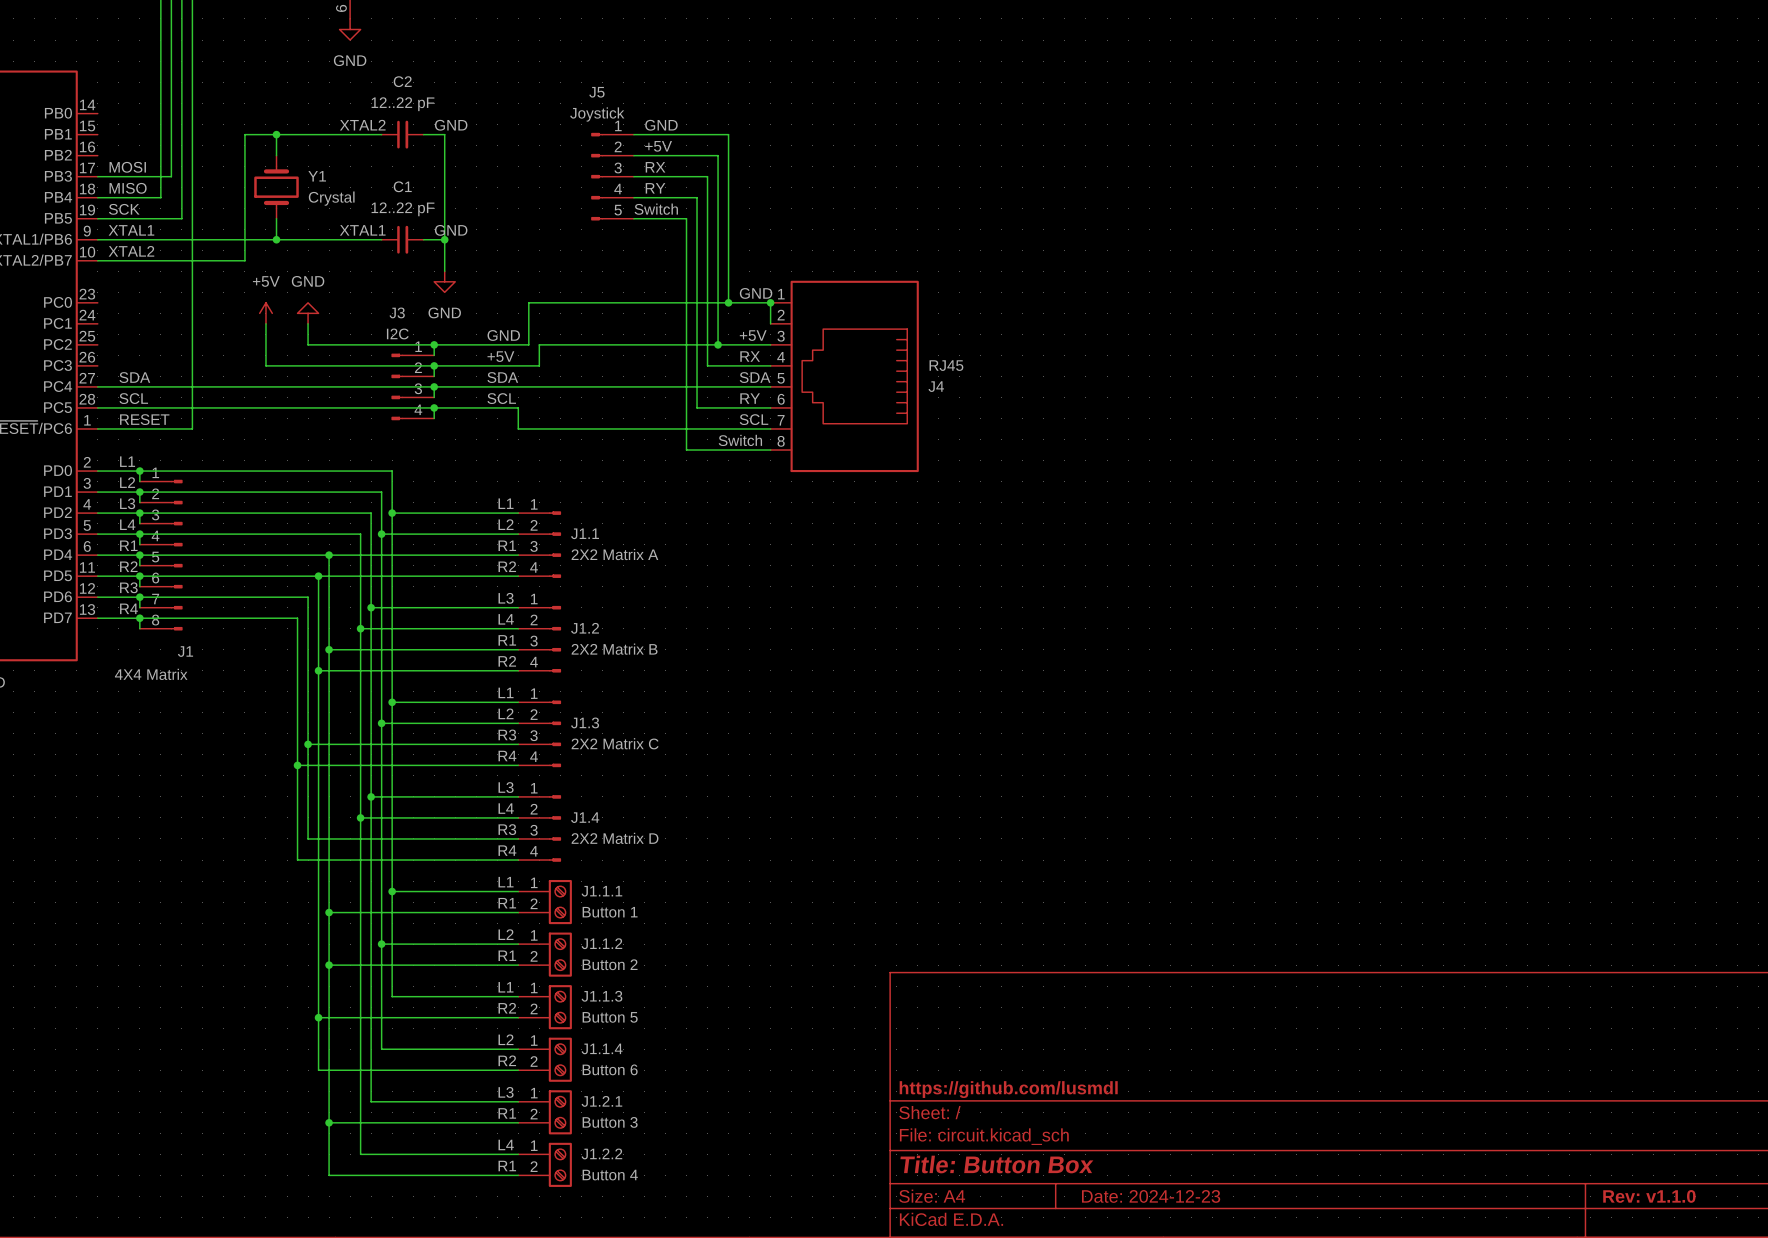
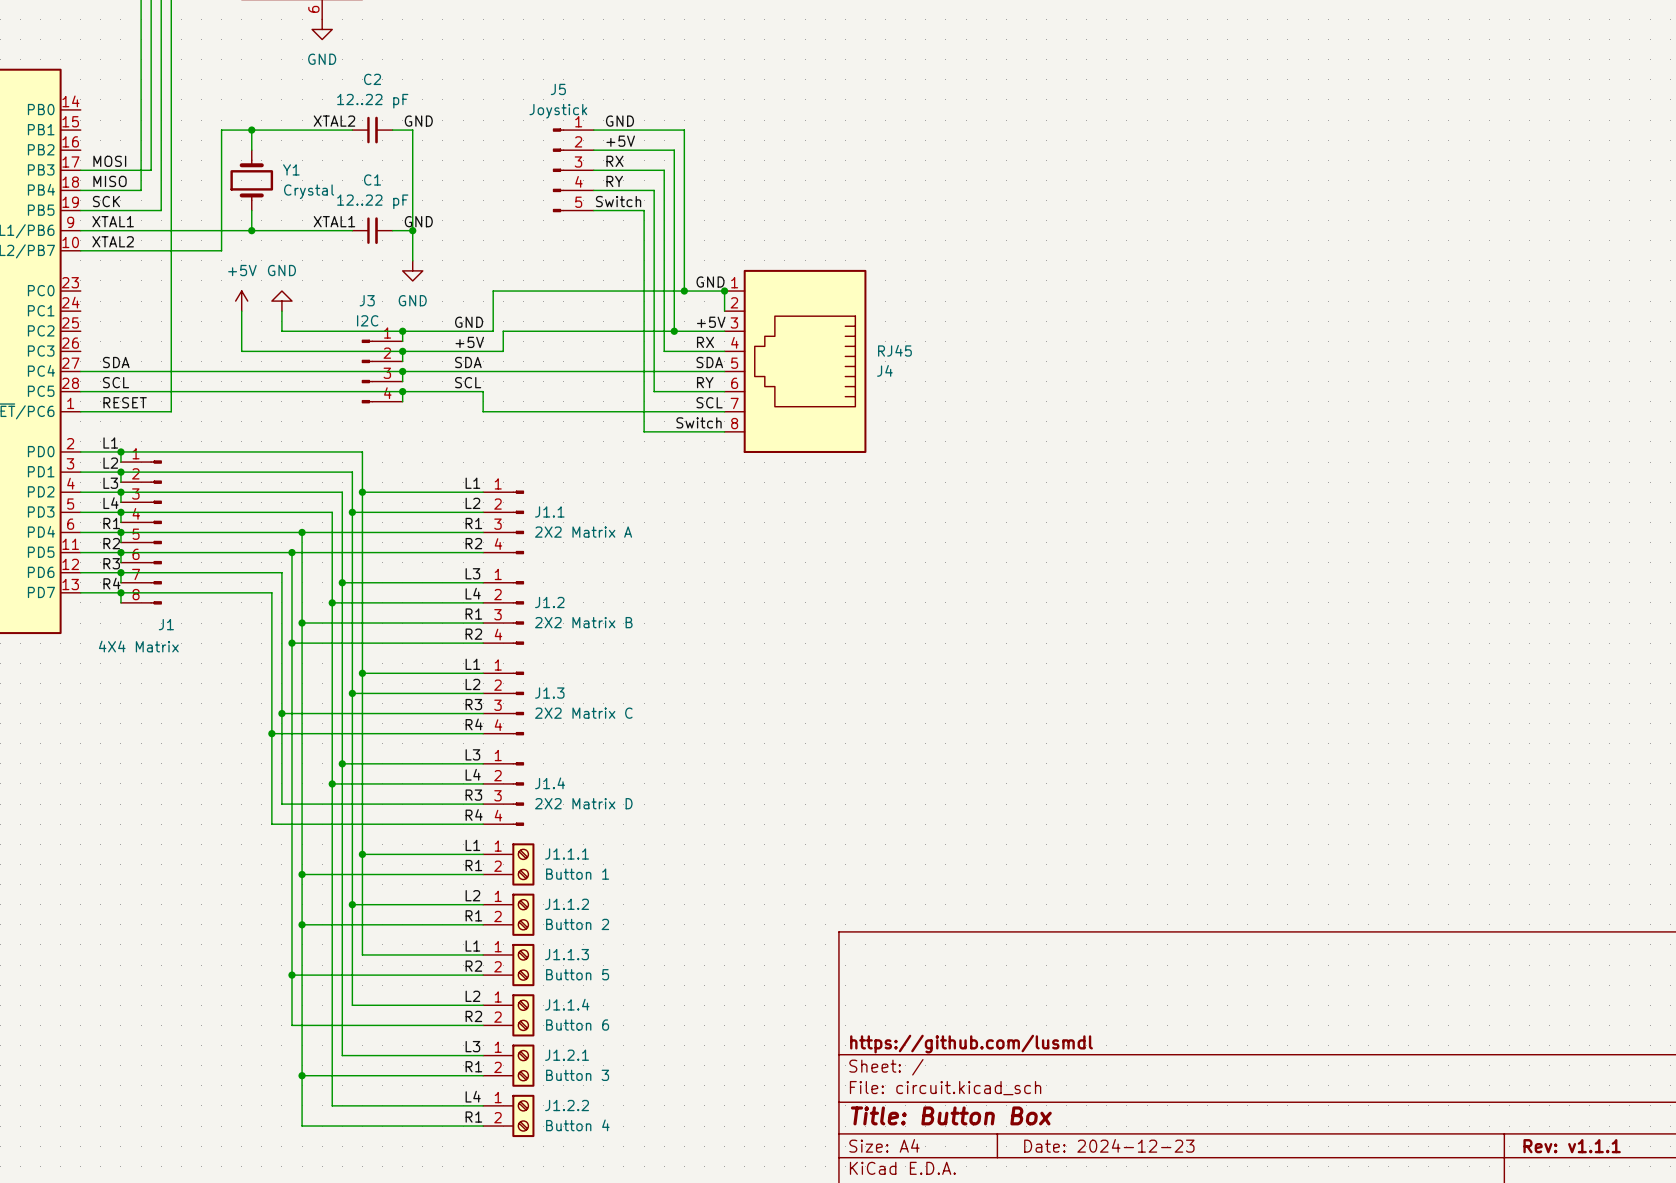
title block: Rev: v1.1.0 (1649, 1196) -> Rev: v1.1.1 (1572, 1146)

